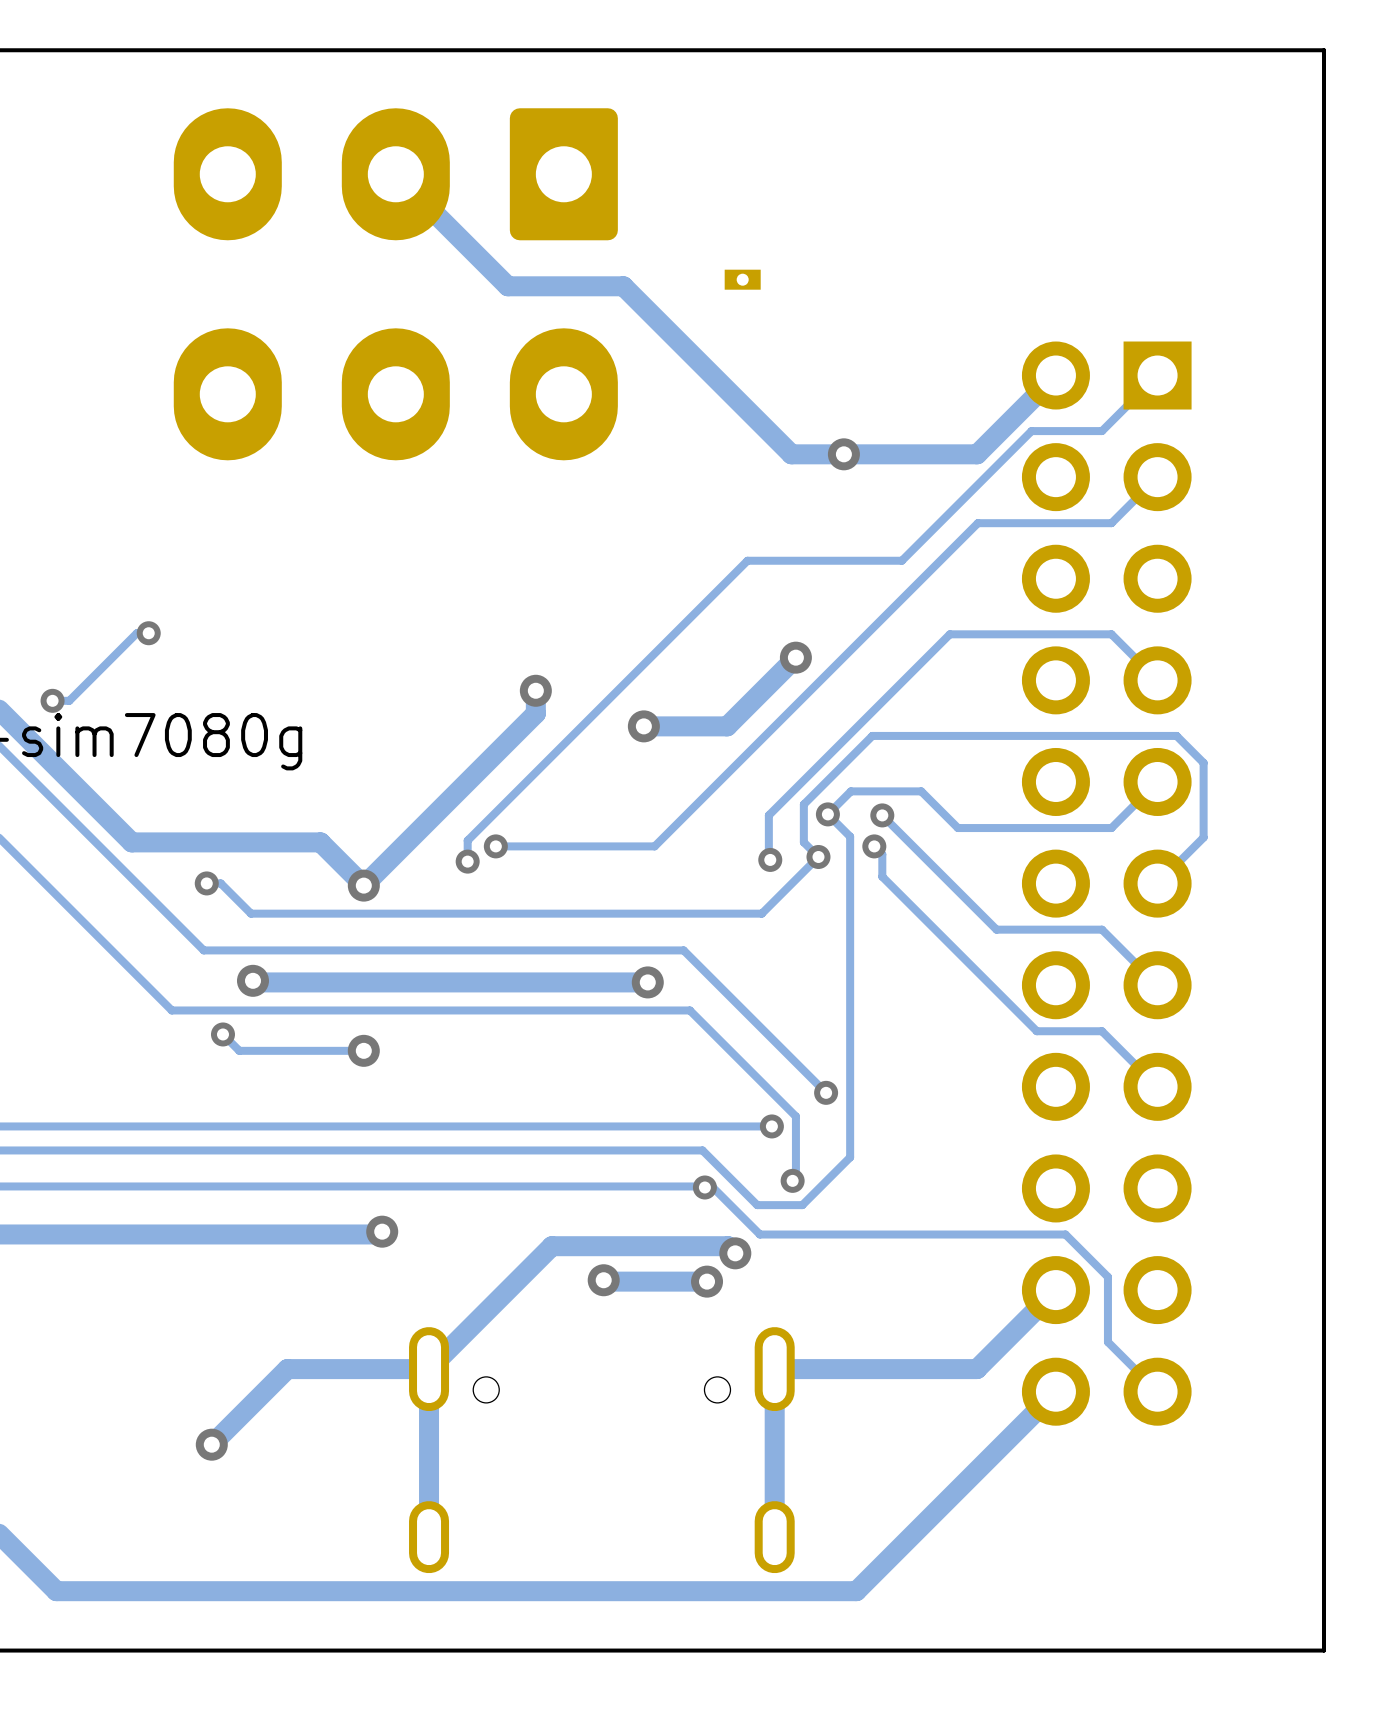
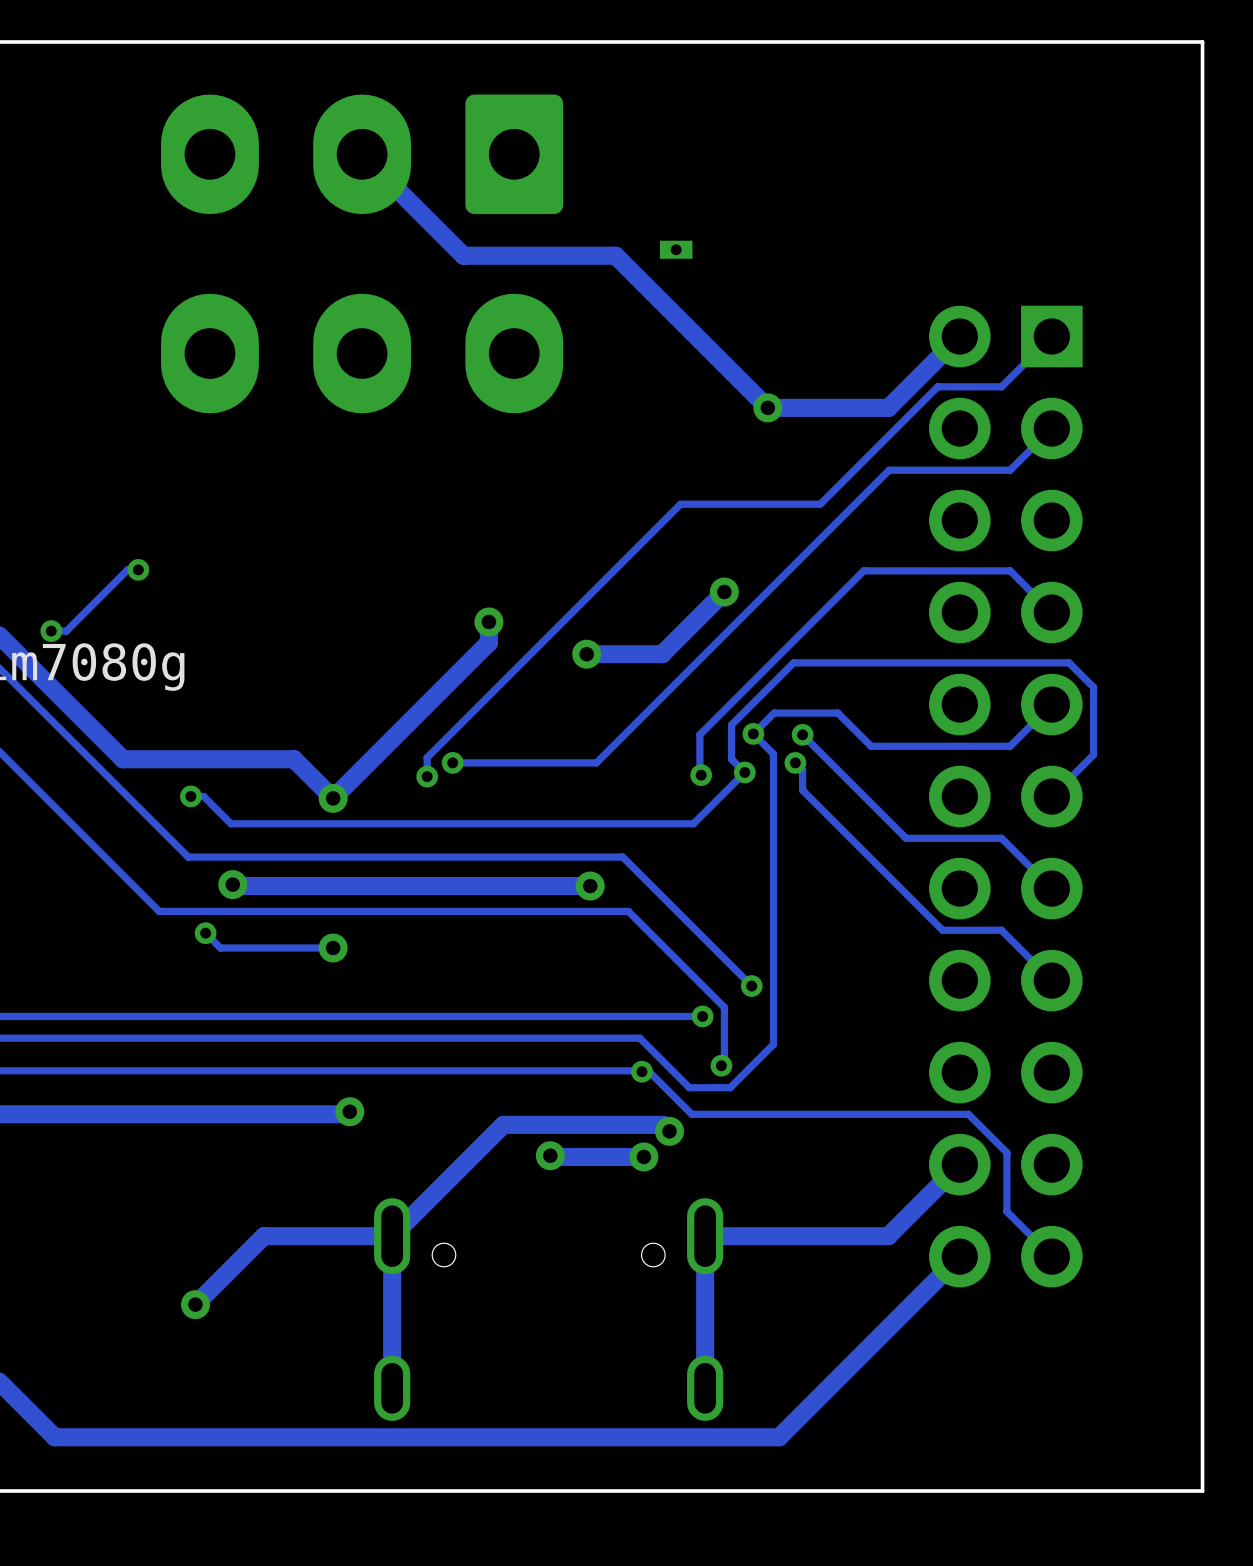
track: (623, 286) (791, 454) (843, 454) -> (568, 255) (615, 255) (767, 407)

